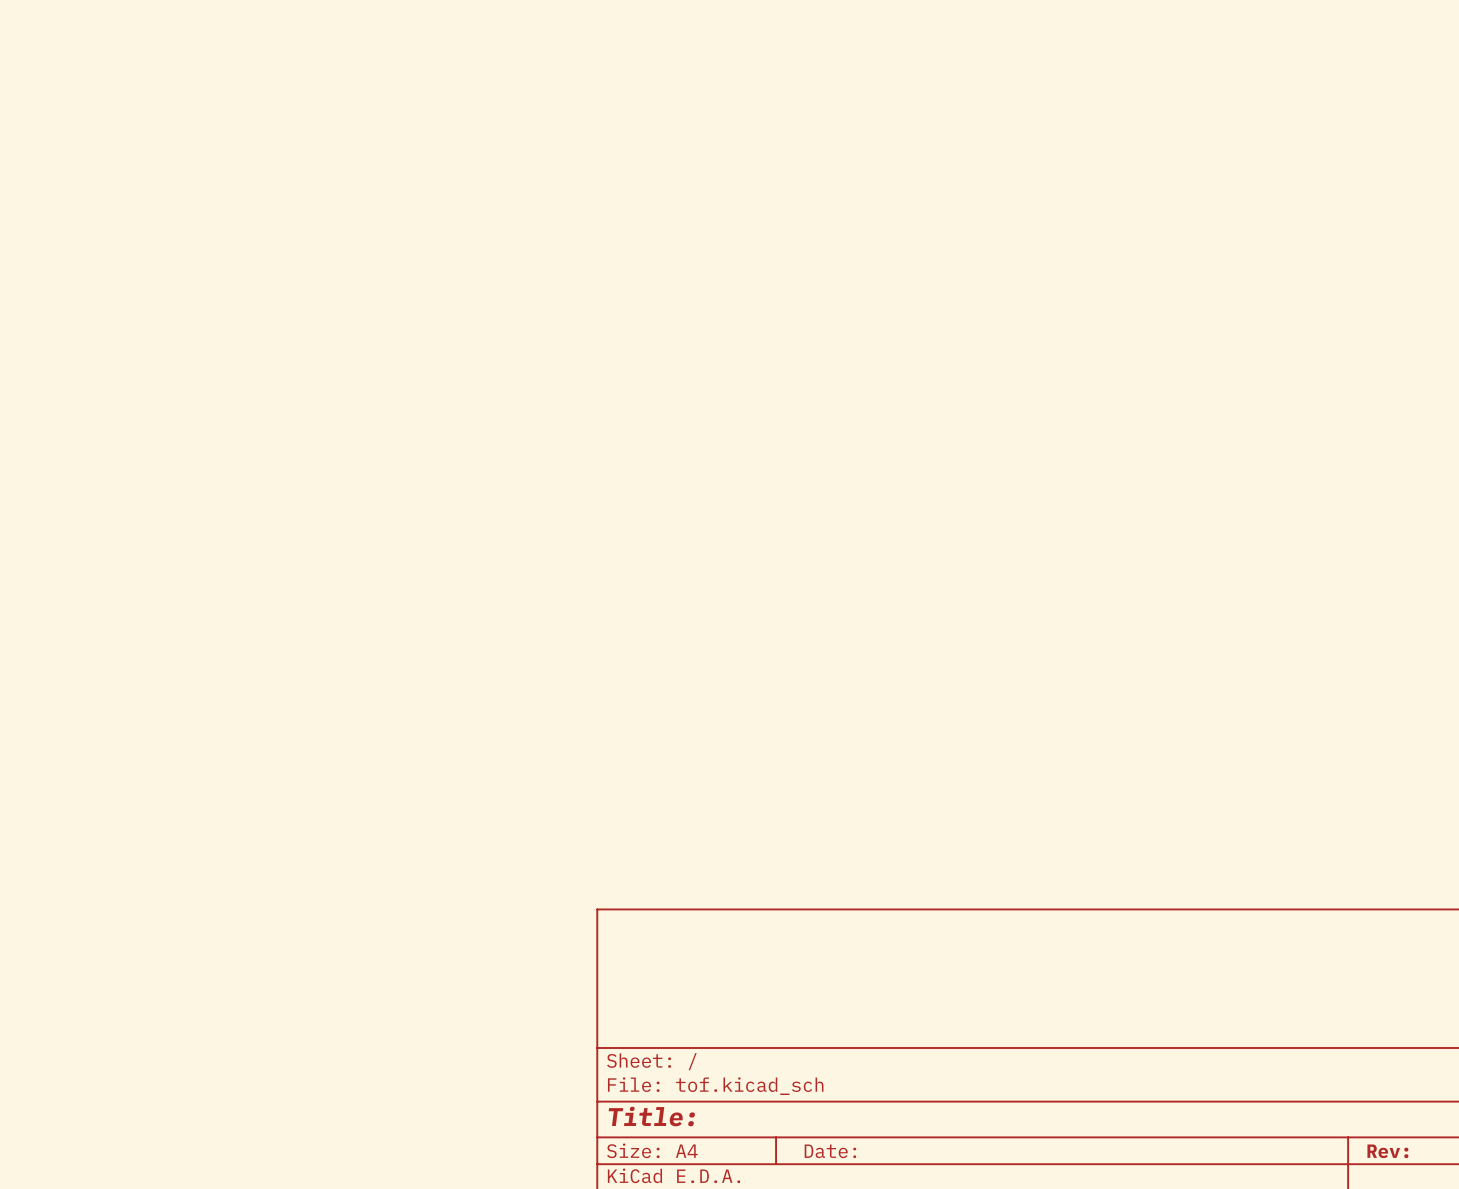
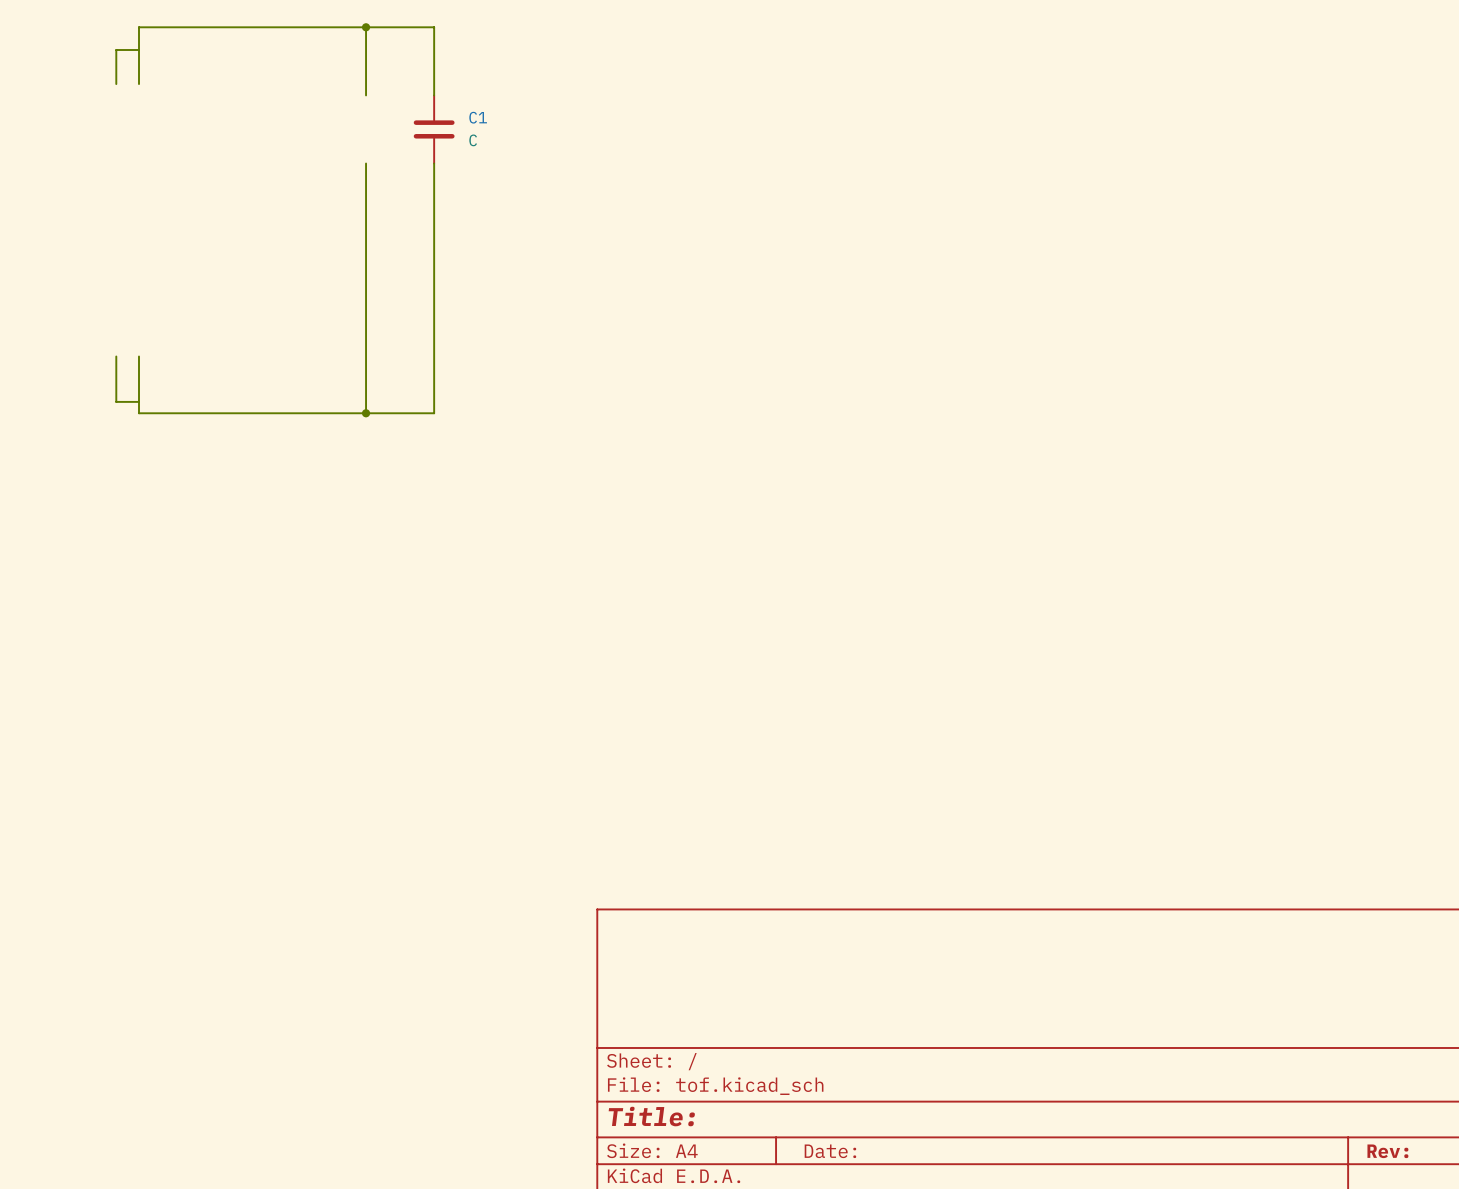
wire: none -> (366, 27) (366, 95)
junction: none -> (366, 27)
wire: none -> (139, 50) (116, 50) (116, 84)
wire: none -> (139, 84) (139, 27) (434, 27) (434, 95)
C1: none -> C (434, 129)
wire: none -> (366, 163) (366, 413)
wire: none -> (434, 163) (434, 413) (139, 413) (139, 356)
wire: none -> (116, 356) (116, 401) (139, 401)
junction: none -> (366, 413)

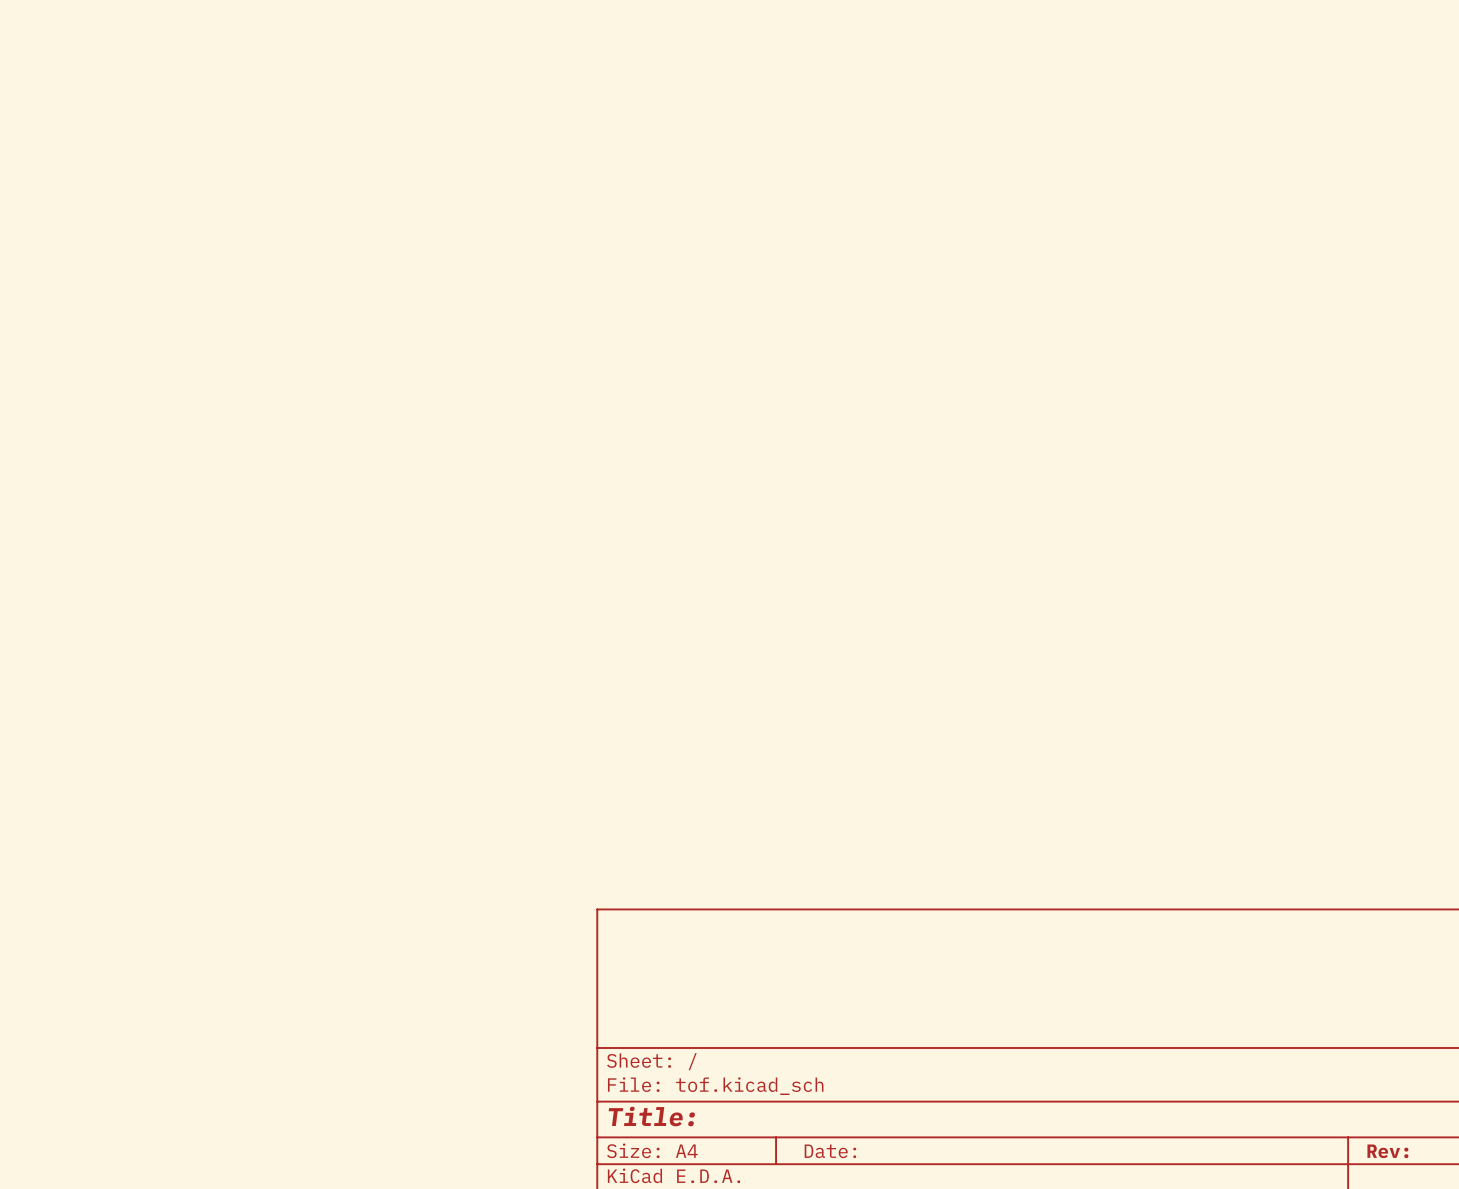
wire: (366, 27) (366, 95) -> none
junction: (366, 27) -> none
wire: (139, 50) (116, 50) (116, 84) -> none
wire: (139, 84) (139, 27) (434, 27) (434, 95) -> none
C1: C (434, 129) -> none
wire: (366, 163) (366, 413) -> none
wire: (434, 163) (434, 413) (139, 413) (139, 356) -> none
wire: (116, 356) (116, 401) (139, 401) -> none
junction: (366, 413) -> none

